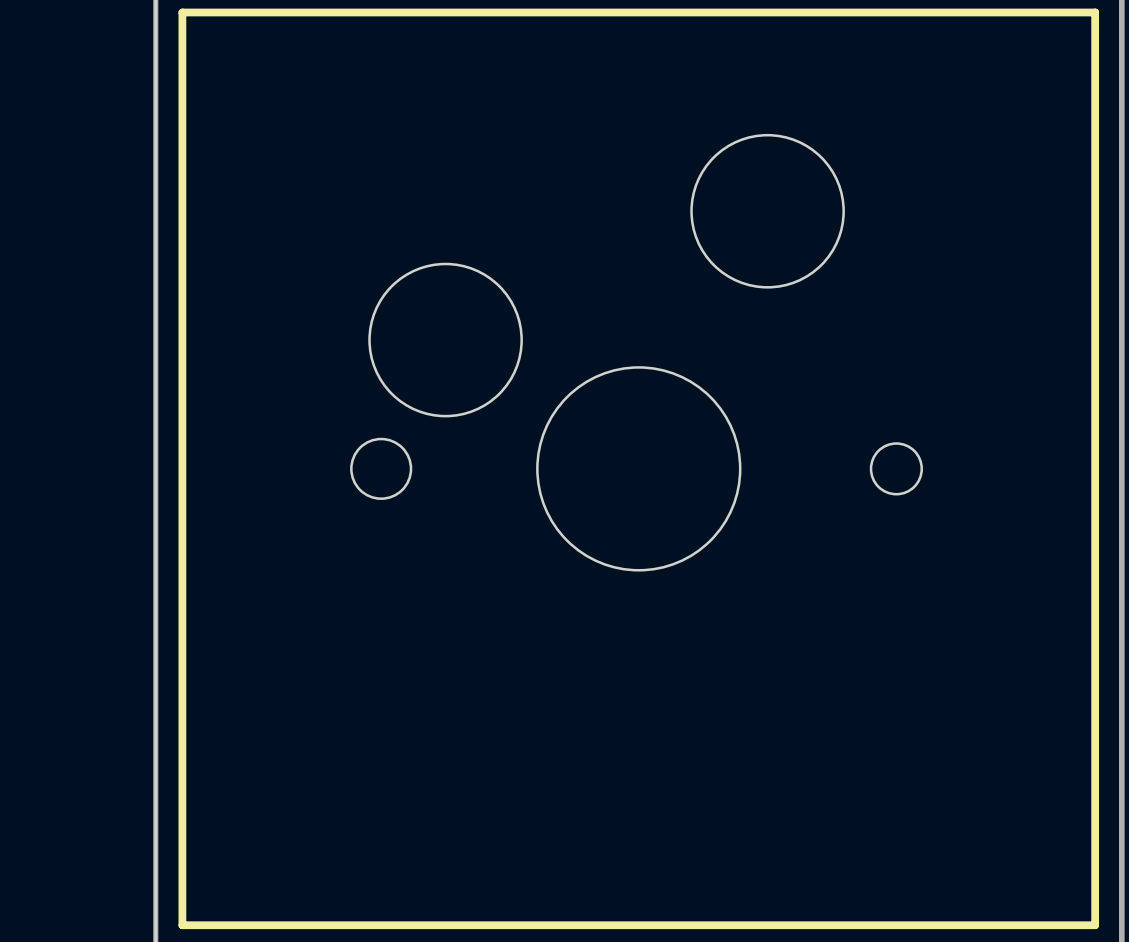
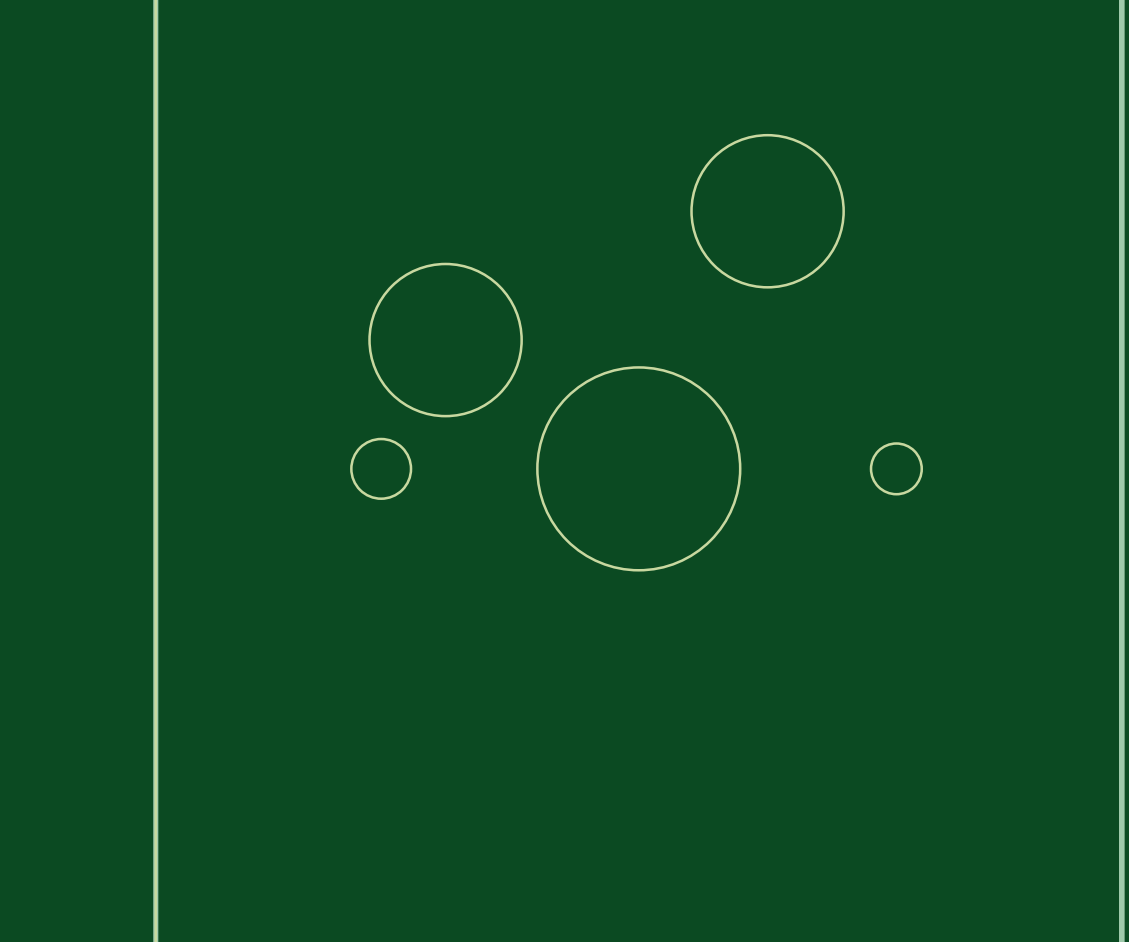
line: (1095, 12) (182, 12) (182, 925) (1095, 925) (1095, 12) -> none

